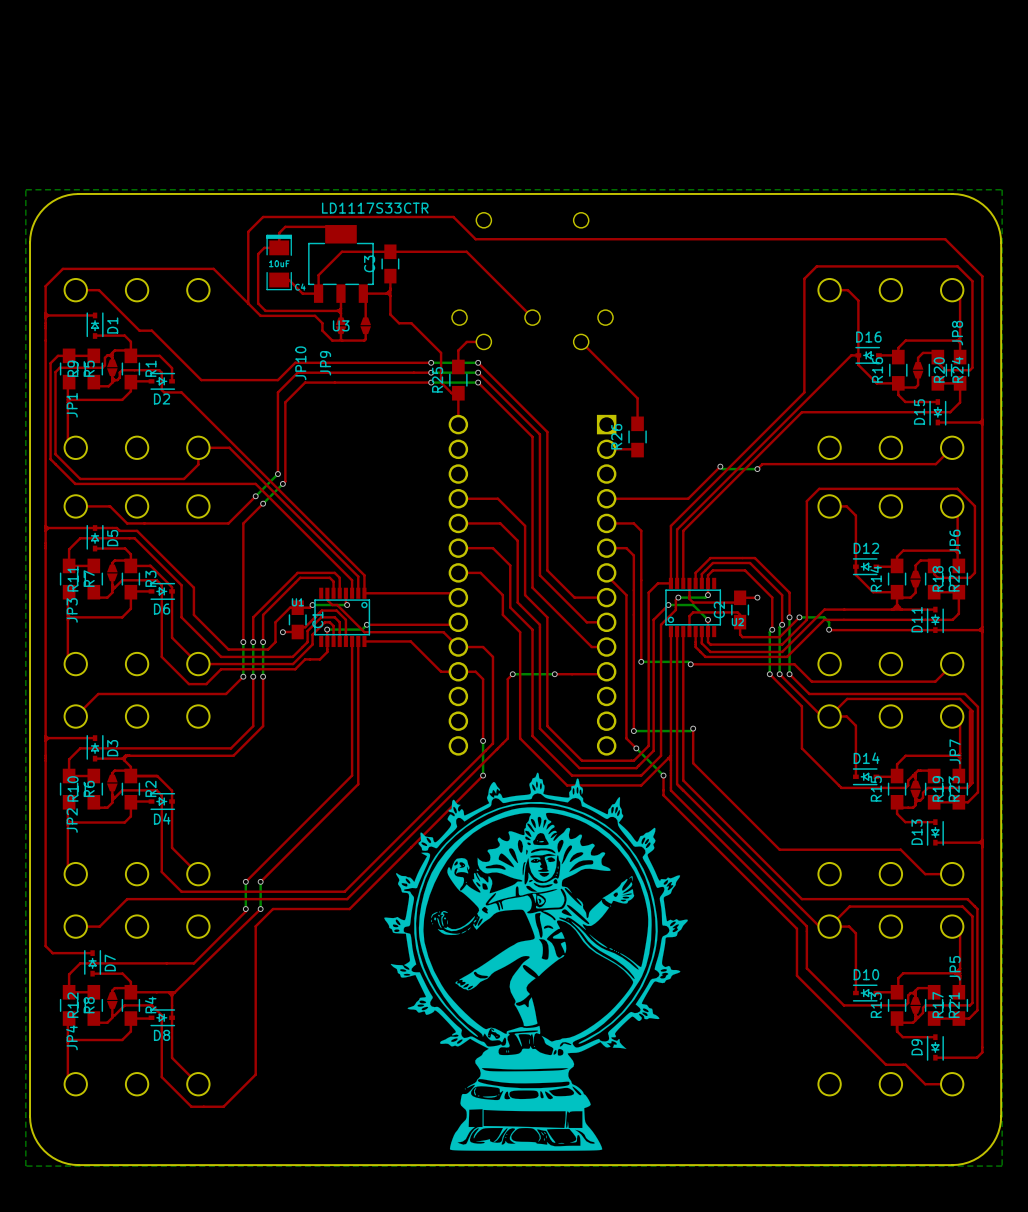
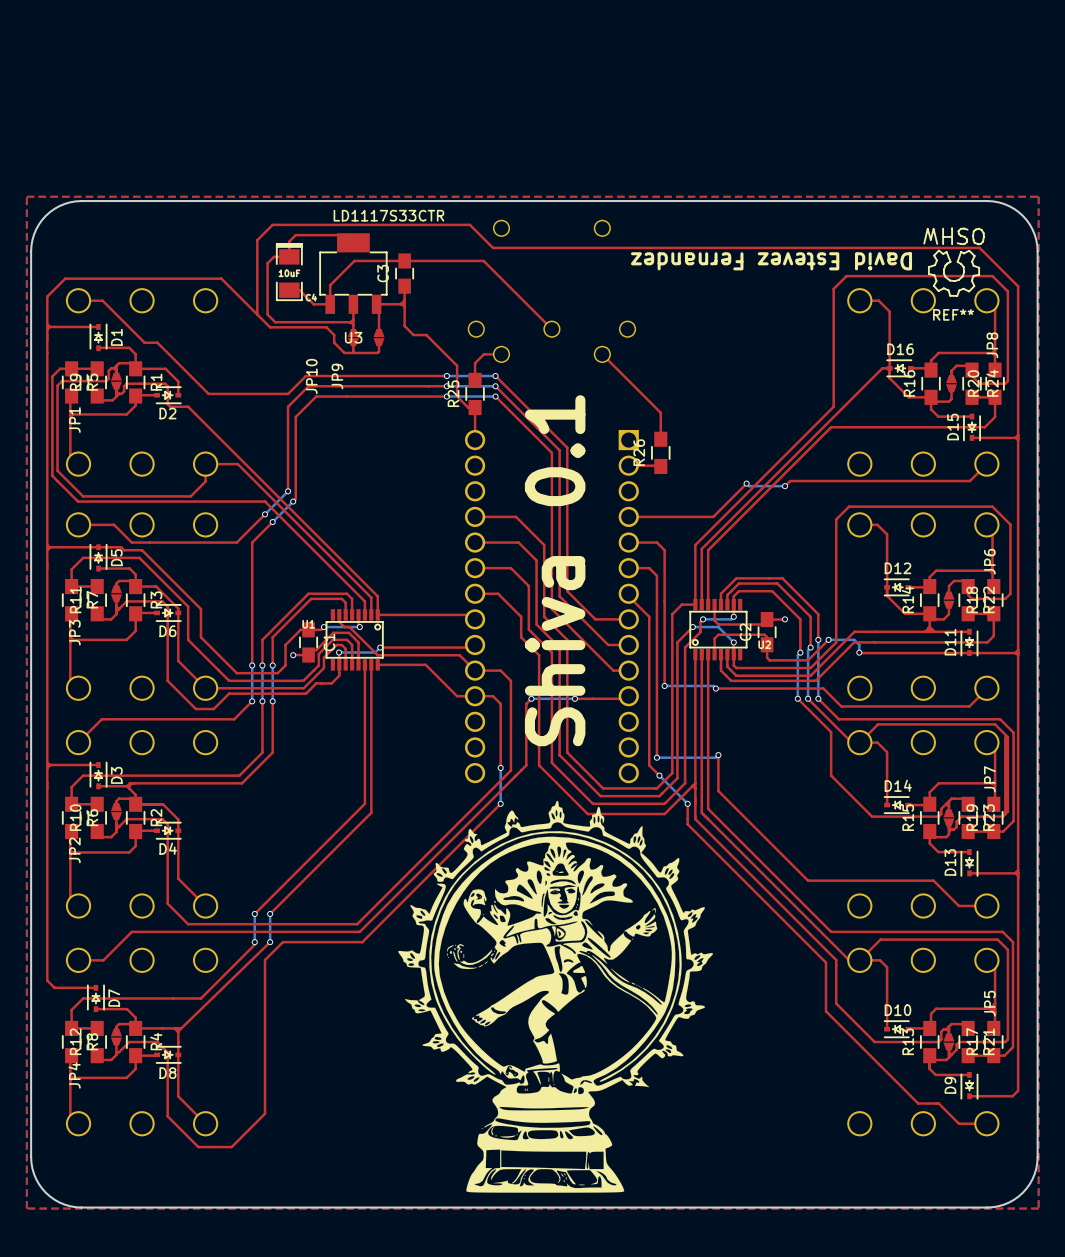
top zone outline: none -> (26, 196) (26, 1208) (1038, 1208) (1038, 196) (26, 196)
text: none -> David Estevez Fernandez (771, 261)
REF**: none -> (954, 262)
text: none -> Shiva 0.1 (555, 570)

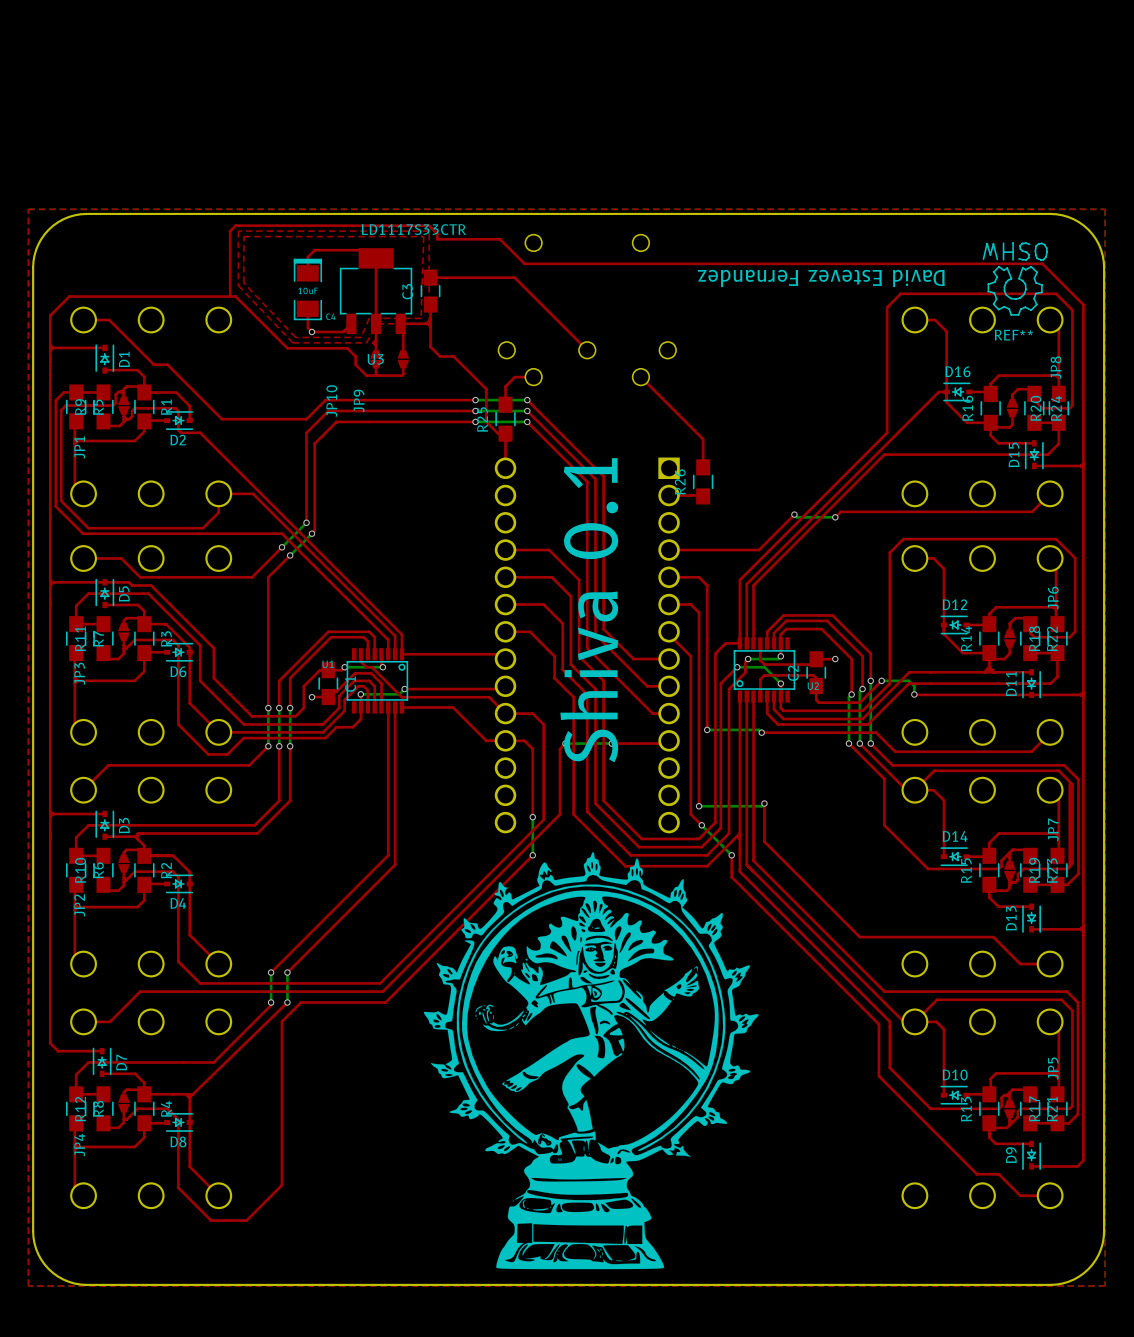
top zone outline: none -> (238, 231) (238, 285) (292, 342) (366, 342) (377, 323) (429, 323) (429, 231) (238, 231)
top zone outline: none -> (243, 236) (243, 282) (295, 337) (361, 337) (369, 318) (421, 318) (423, 236) (243, 236)
top track: (411, 224) (272, 224) (257, 240) (257, 314) -> (437, 239) (437, 233) (429, 225) (235, 225) (230, 231) (230, 296)
top track: none -> (376, 258) (376, 323)
top track: (289, 256) (273, 256) (267, 263) (267, 314) (275, 322) (352, 322) -> none
top track: (404, 260) (354, 260) (330, 285) (330, 304) (313, 304) (299, 290) (289, 290) -> (351, 323) (343, 331) (311, 331) (307, 327) (307, 308)
via: none -> (311, 331)

